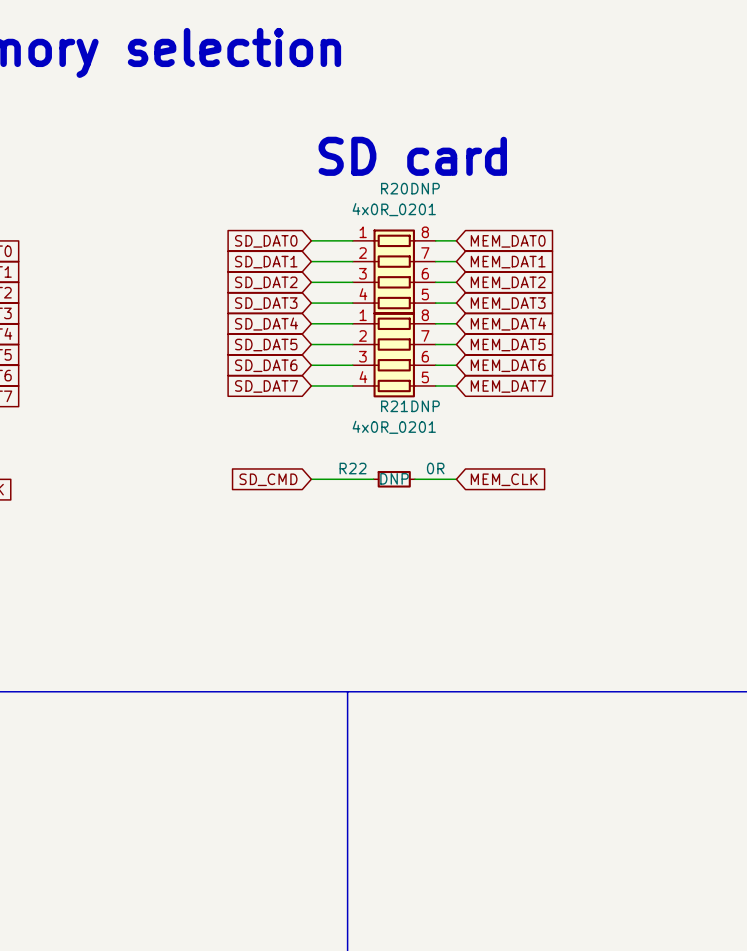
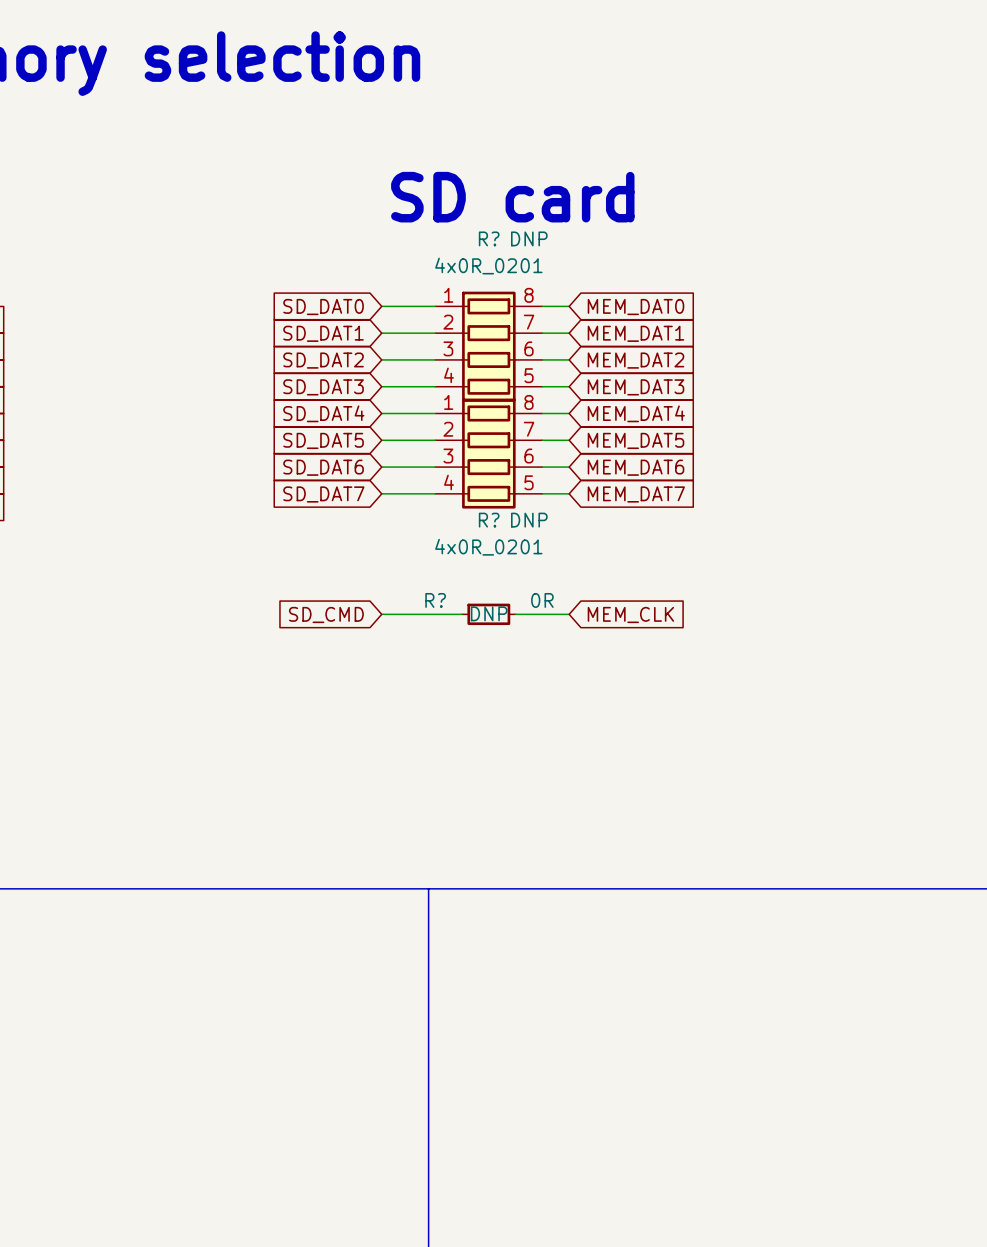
R20 name: R20 (394, 188) -> R? (489, 238)
R21 name: R21 (394, 406) -> R? (489, 520)
R22 name: R22 (353, 468) -> R? (435, 600)

